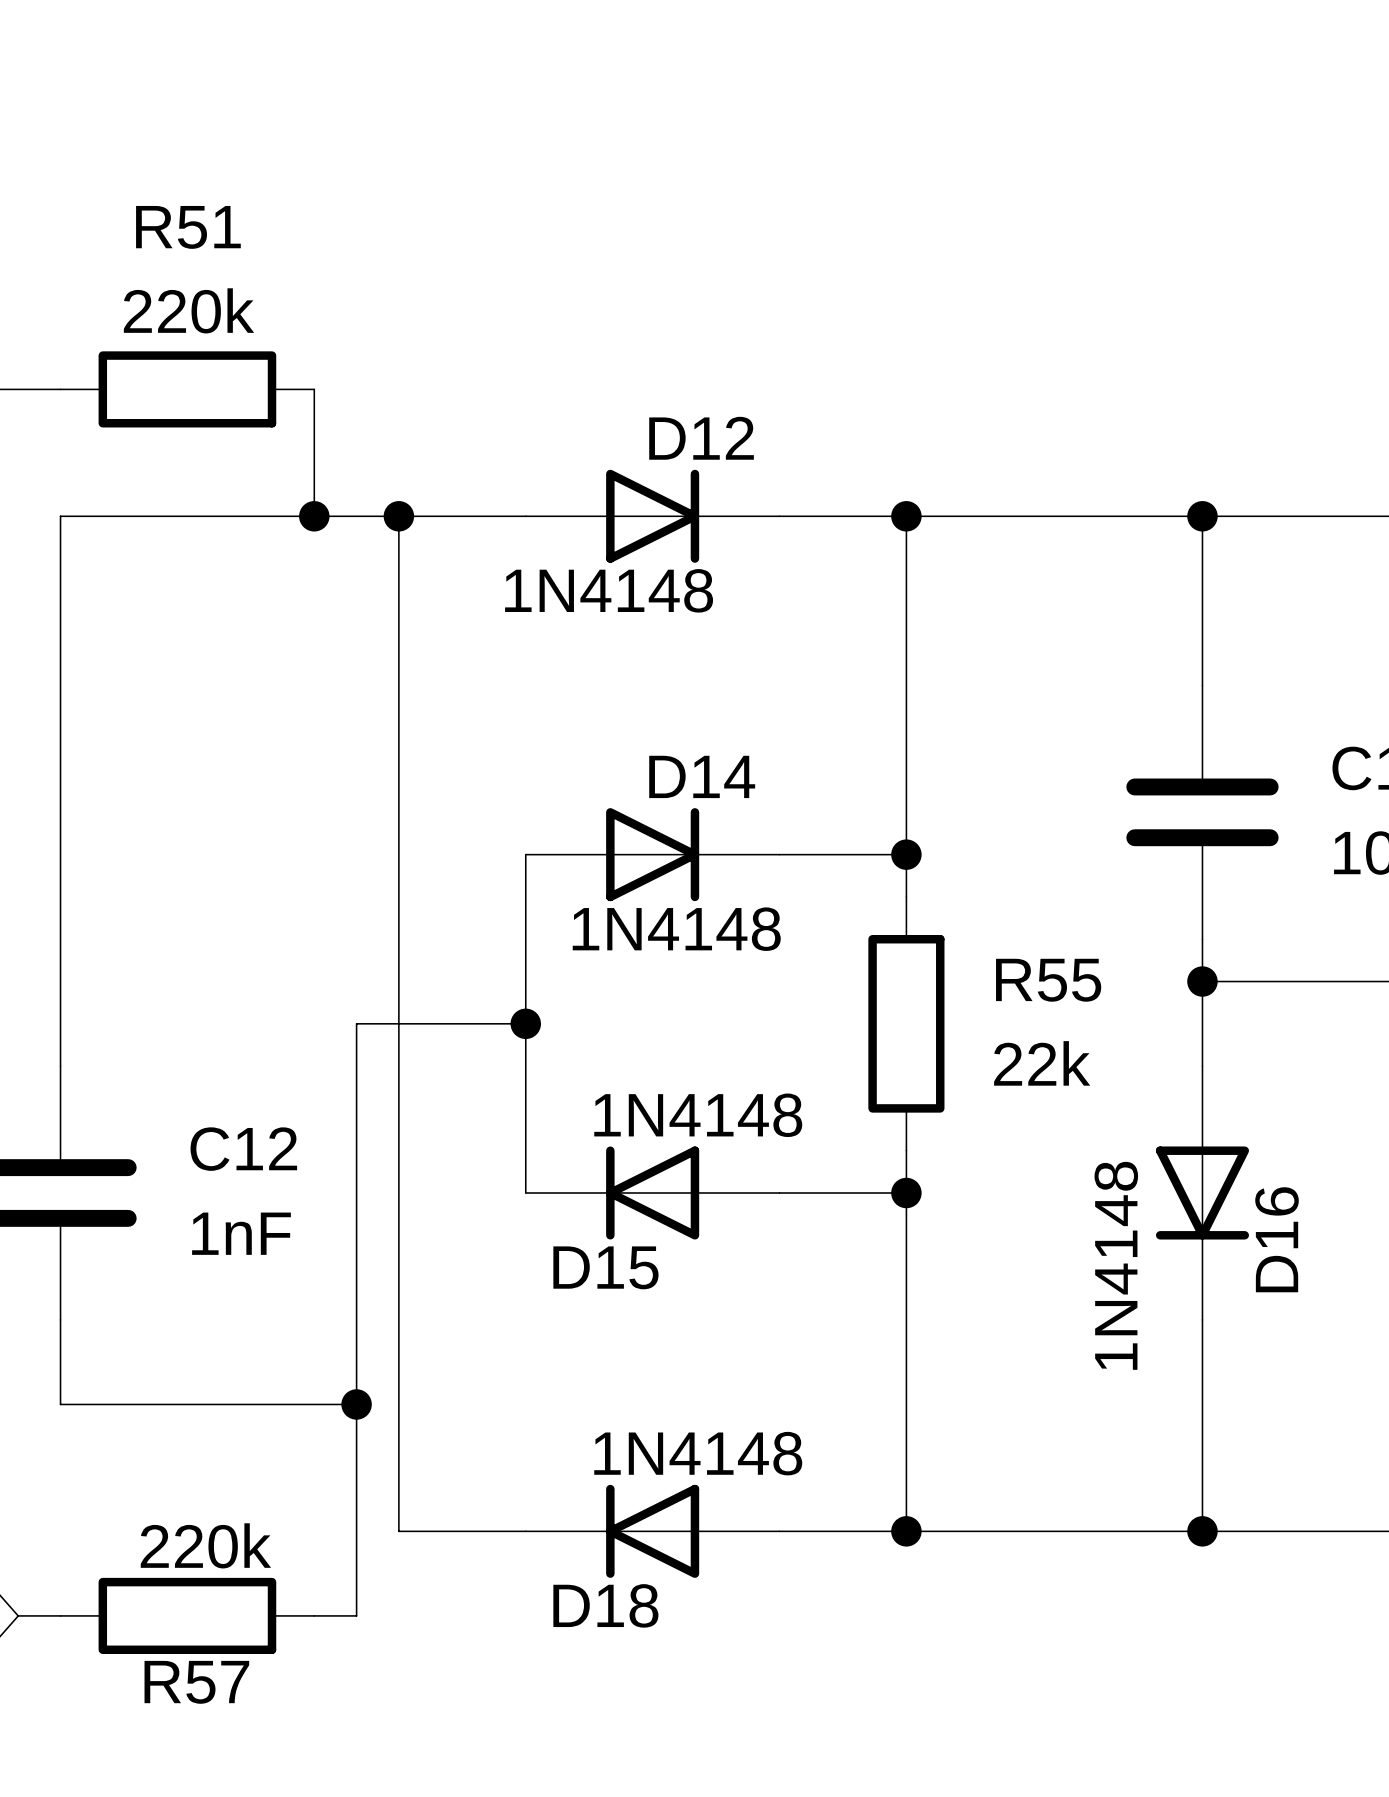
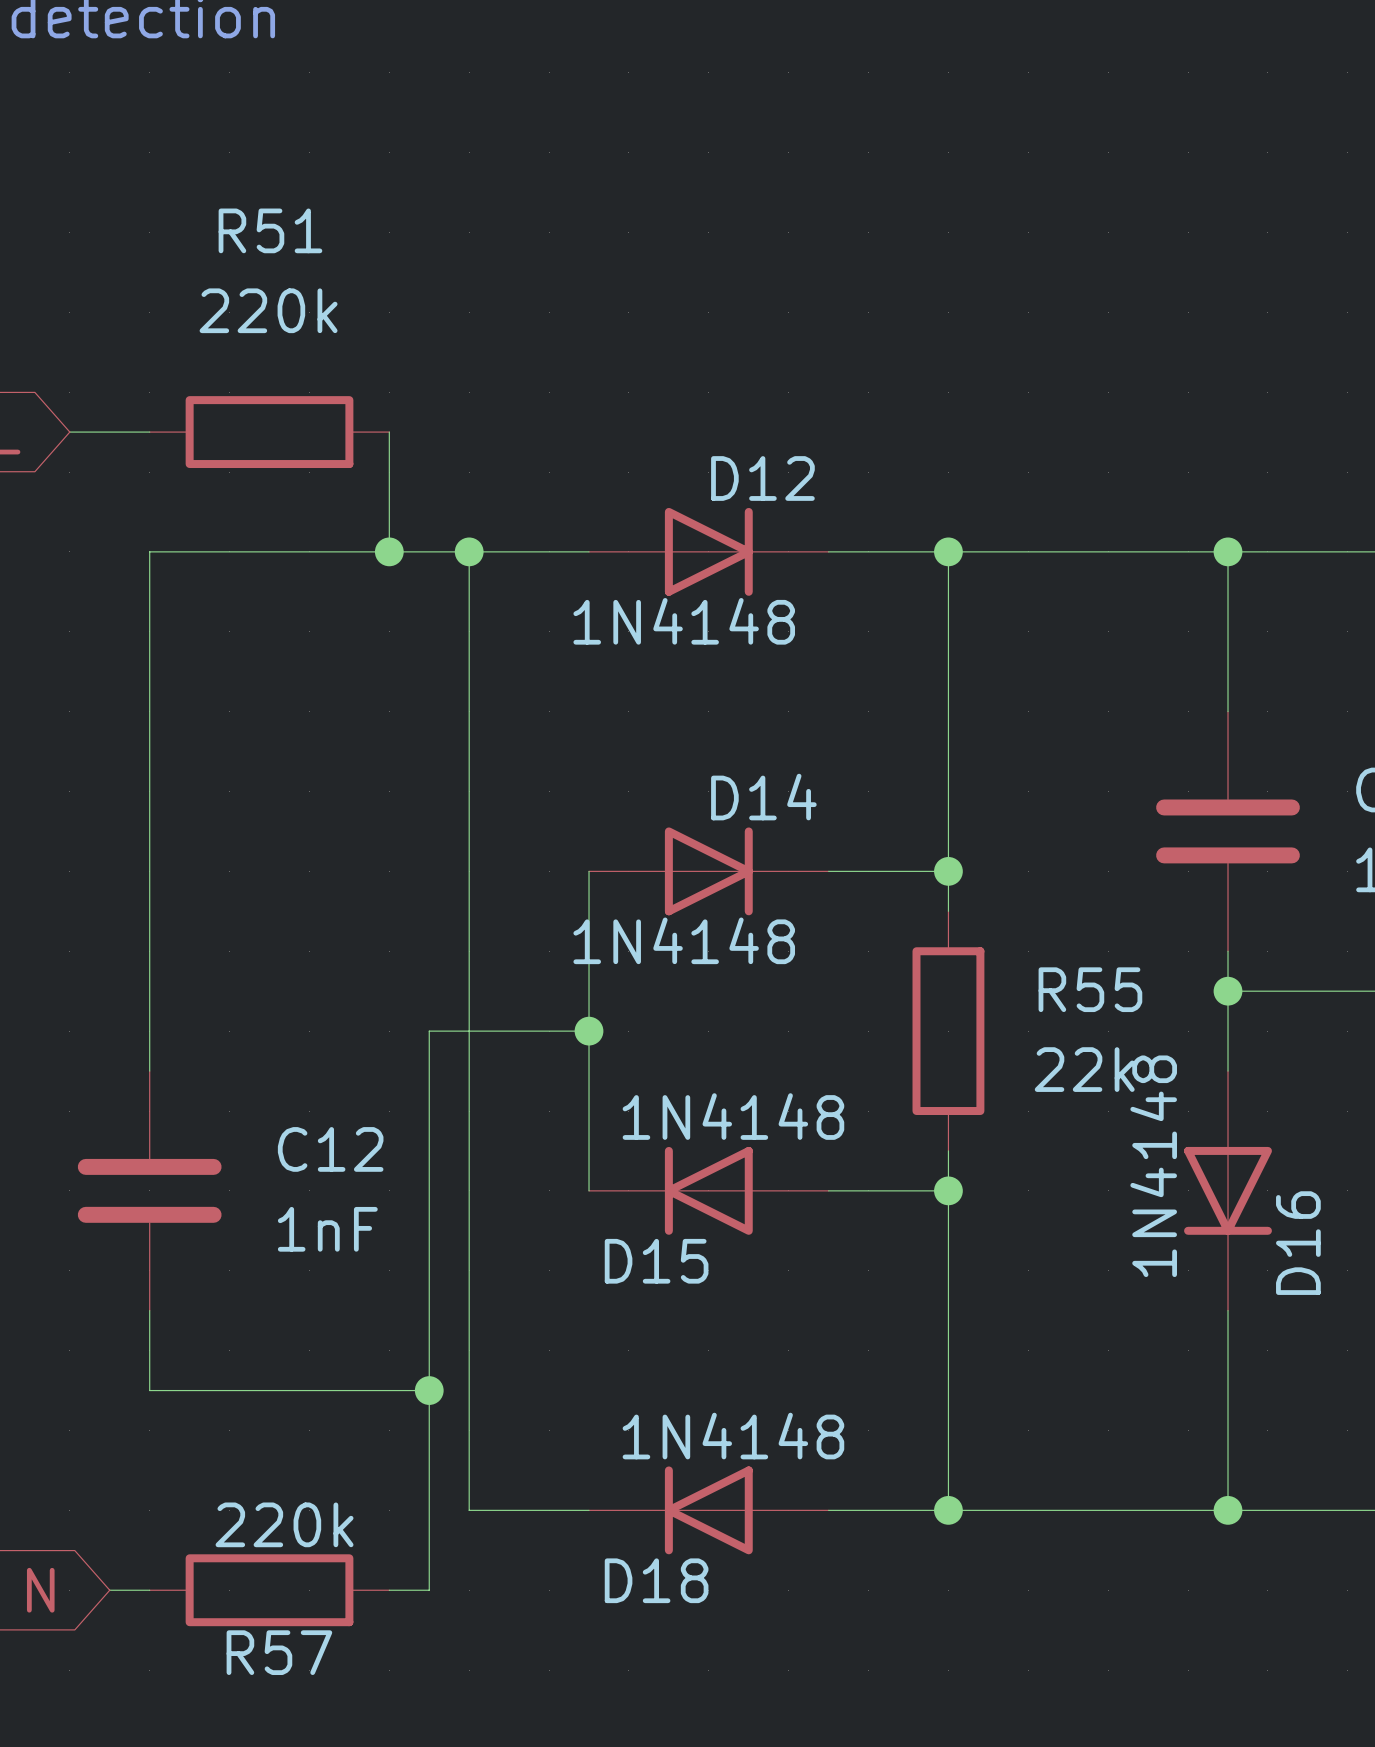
R51 name position: R51 (188, 227) -> R51 (270, 230)
R51 value position: 220k (189, 310) -> 220k (268, 310)
D14 value position: 1N4148 (676, 929) -> 1N4148 (684, 940)
D16 value position: 1N4148 (1116, 1265) -> 1N4148 (1153, 1166)

